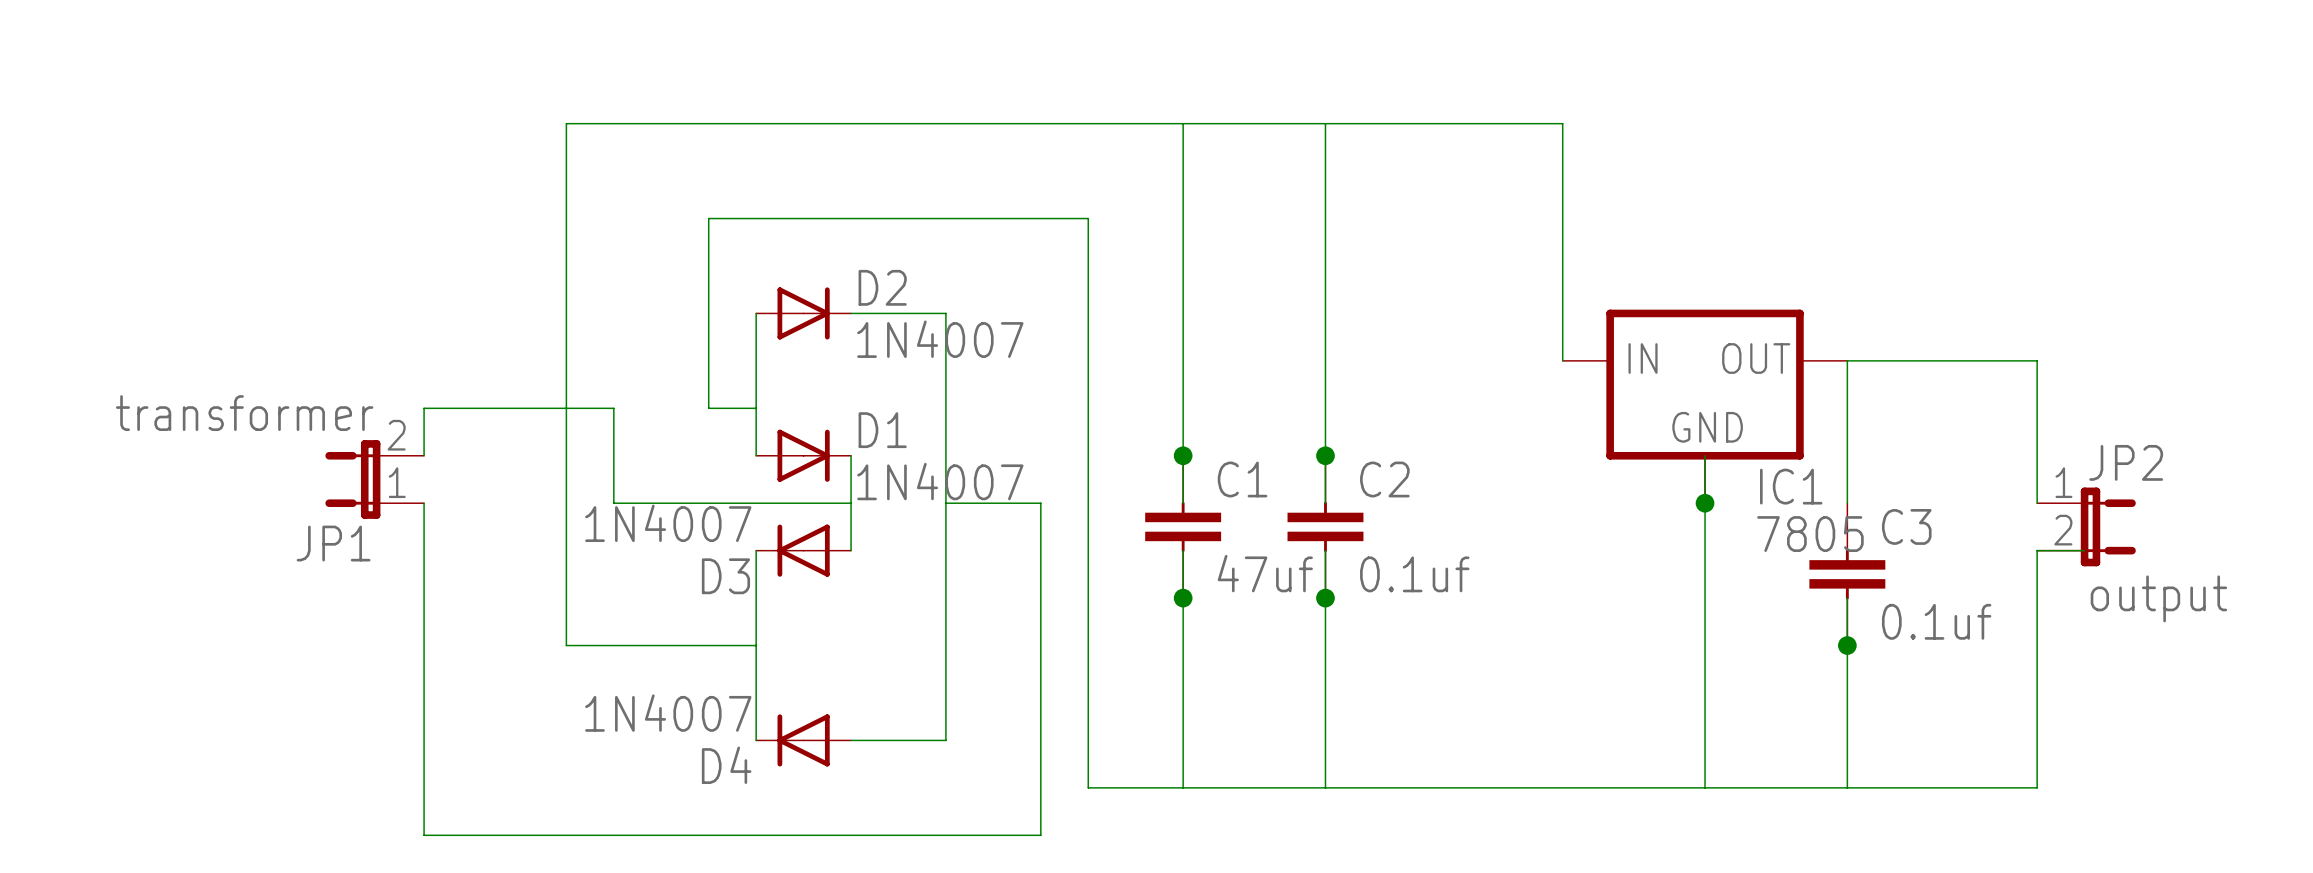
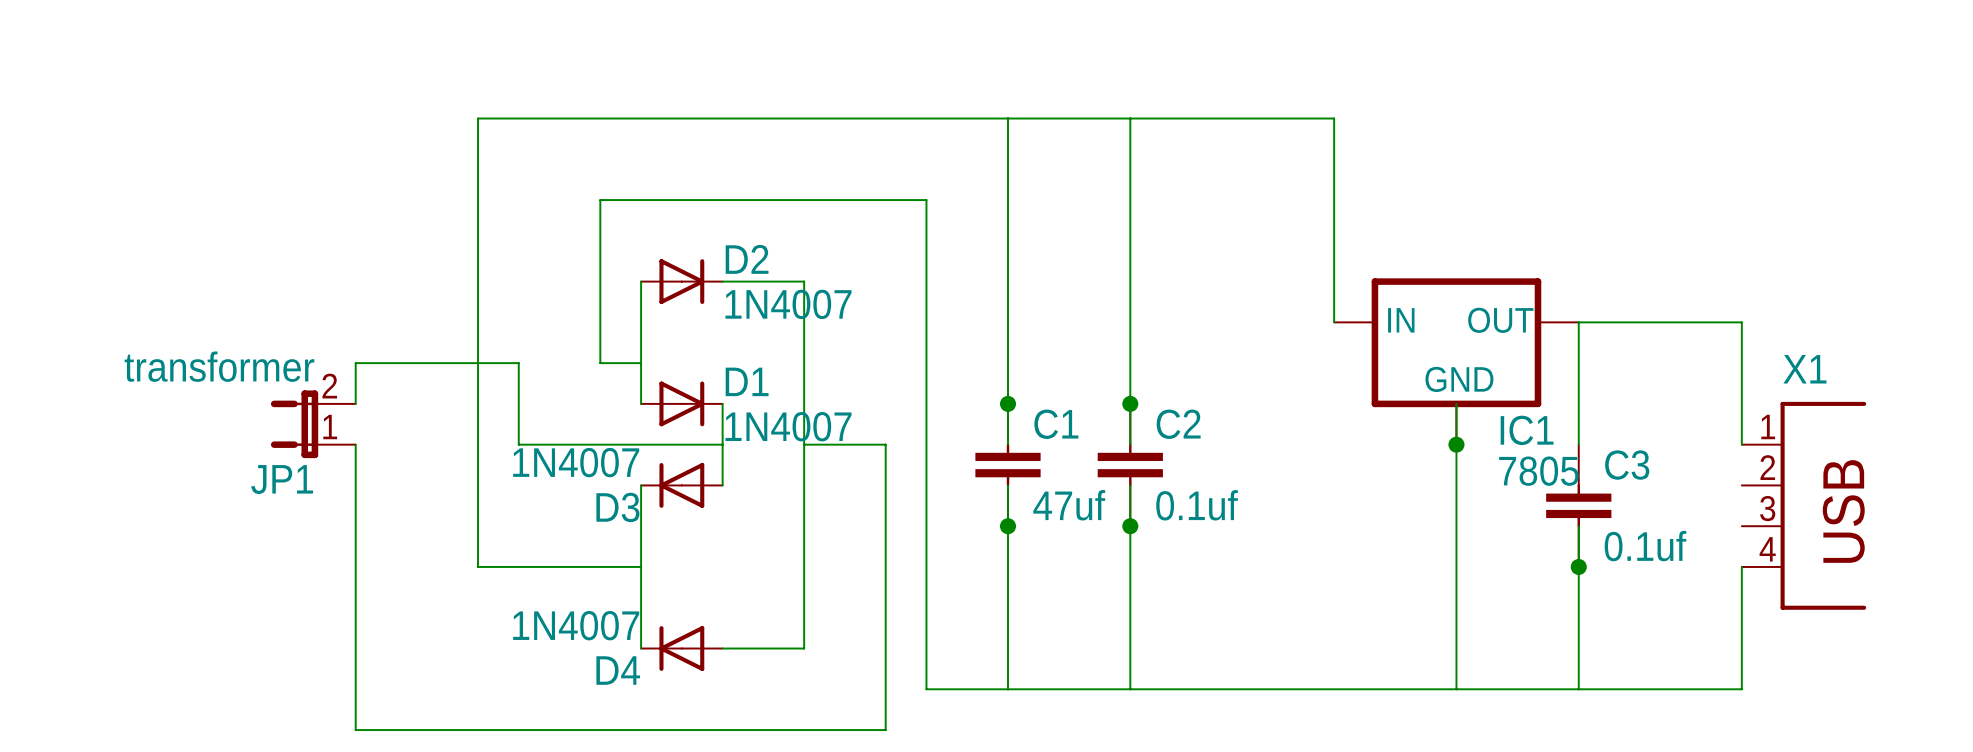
JP2: output (2086, 526) -> none
wire: (2084, 550) (2037, 550) (2037, 645) -> none
X1: none -> (1804, 505)

